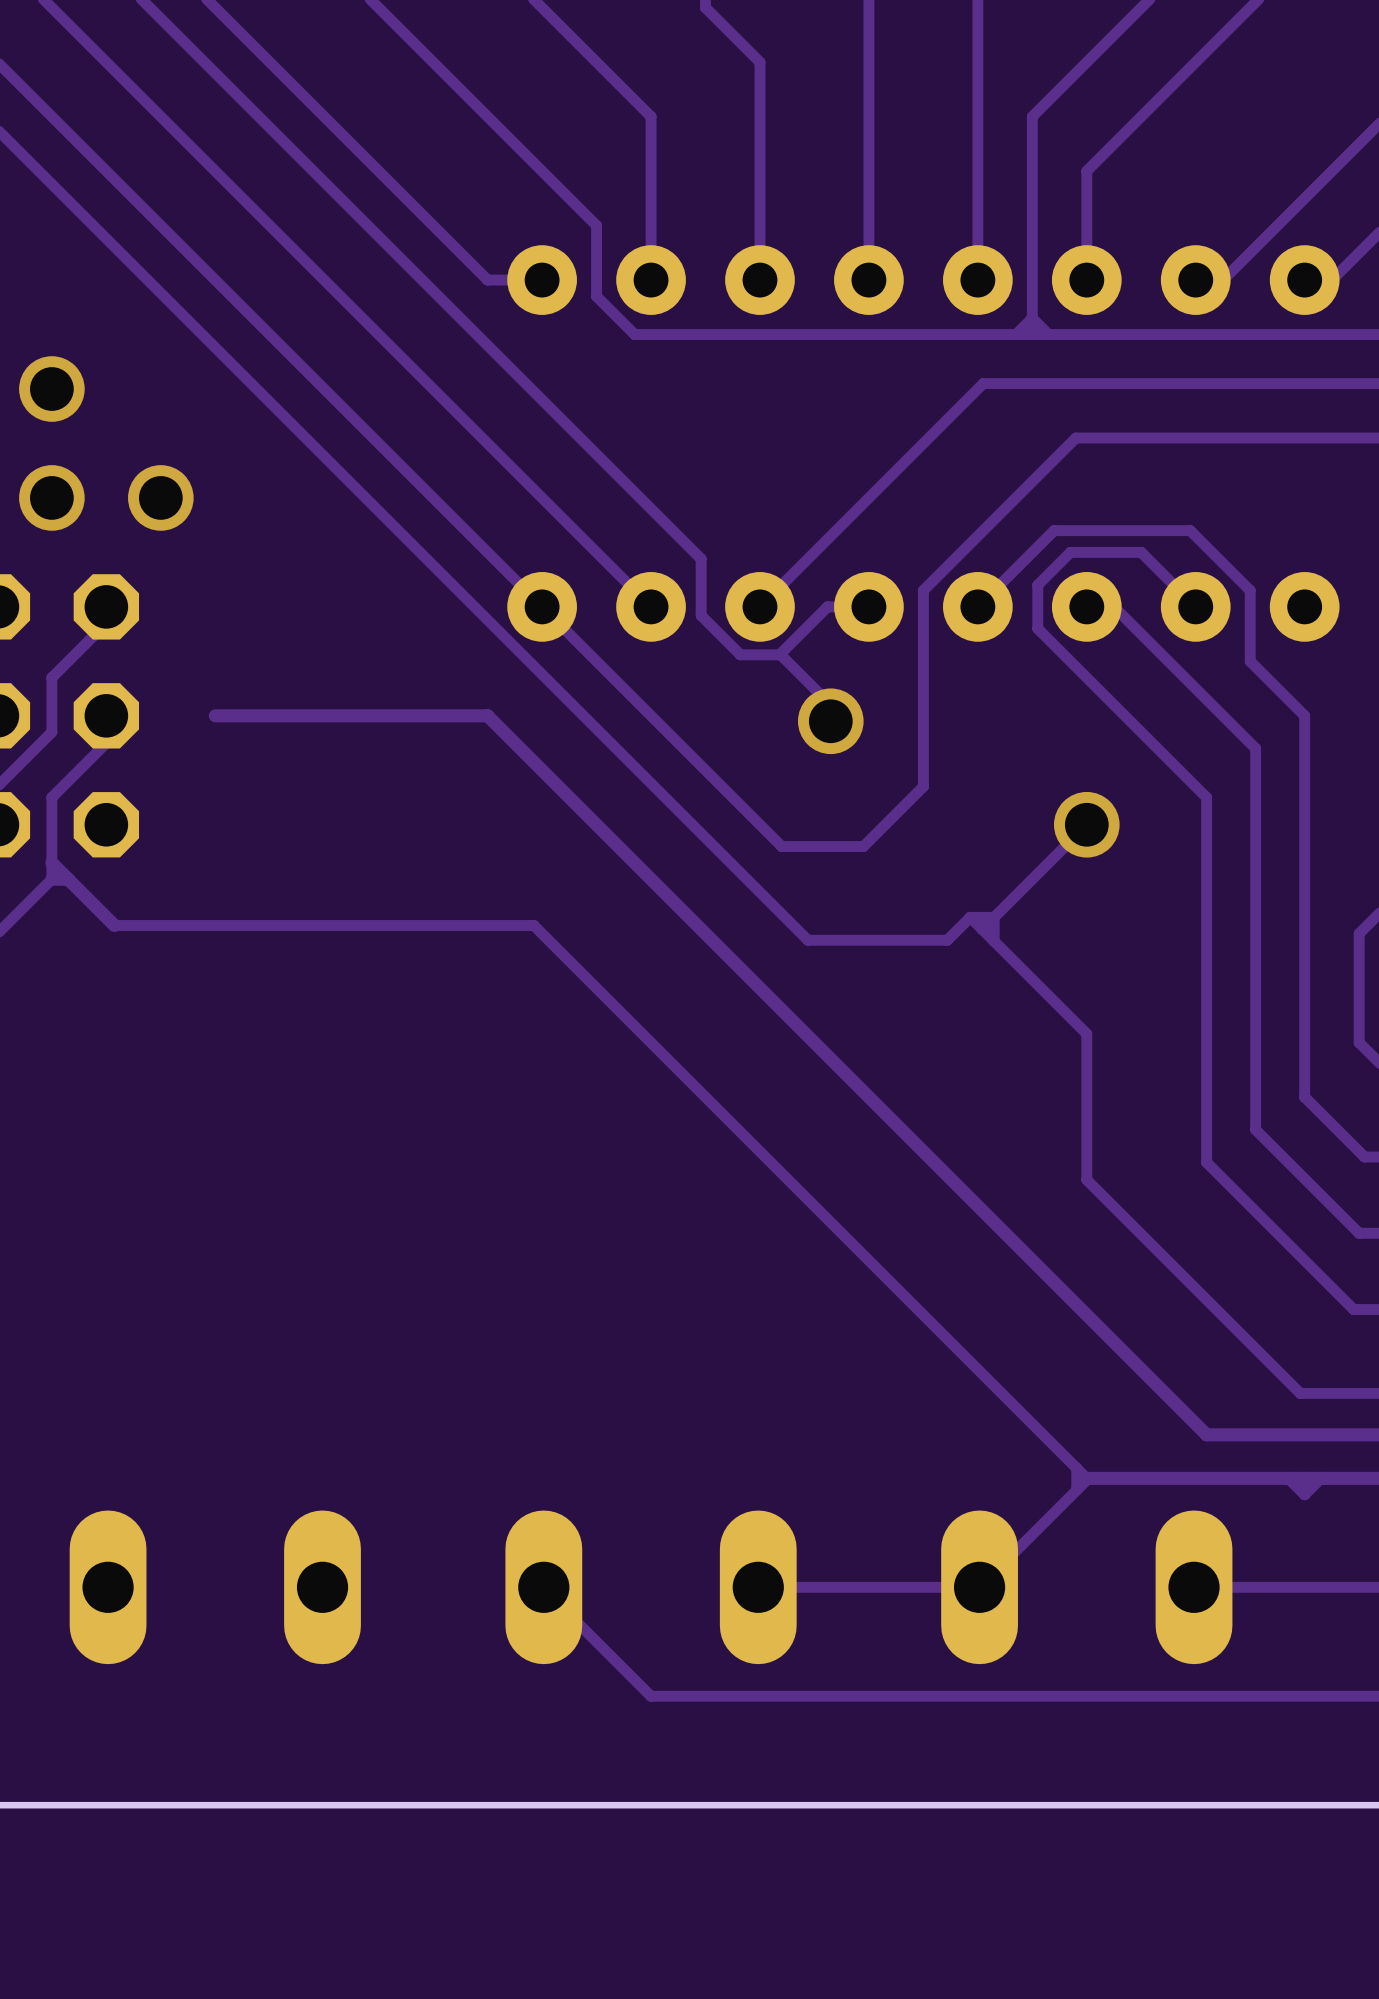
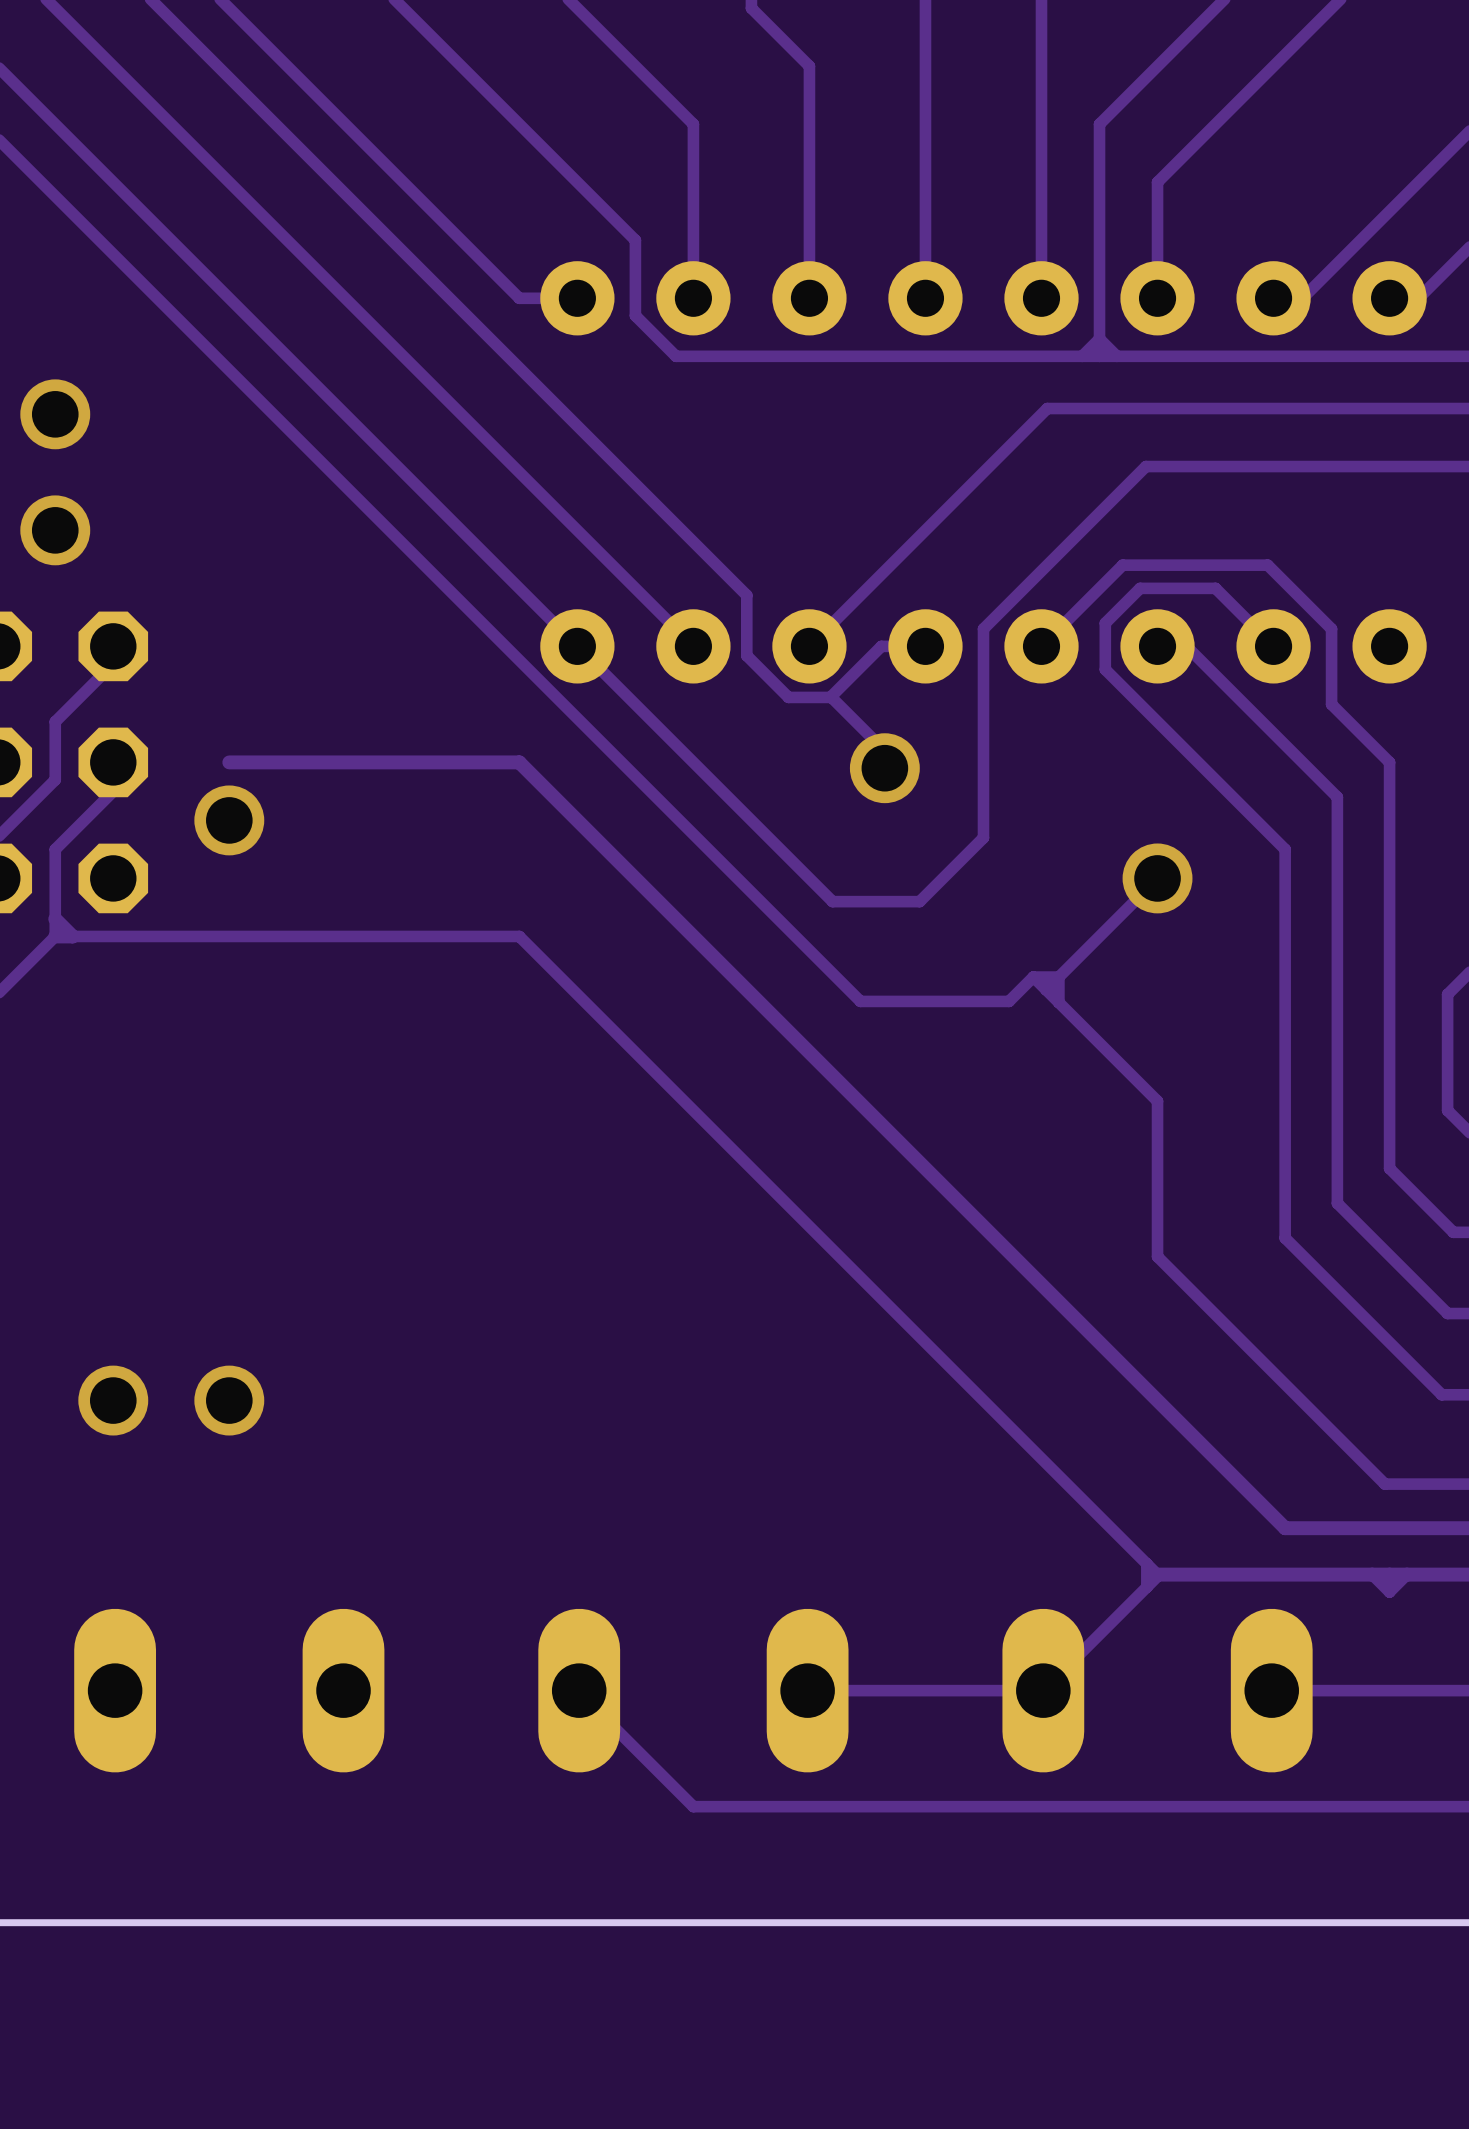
via: (160, 497) -> none
via: none -> (229, 820)
track: (68, 879) (114, 925) (533, 925) -> (72, 936) (519, 936) (568, 985)
via: none -> (113, 1400)
via: none -> (229, 1400)

